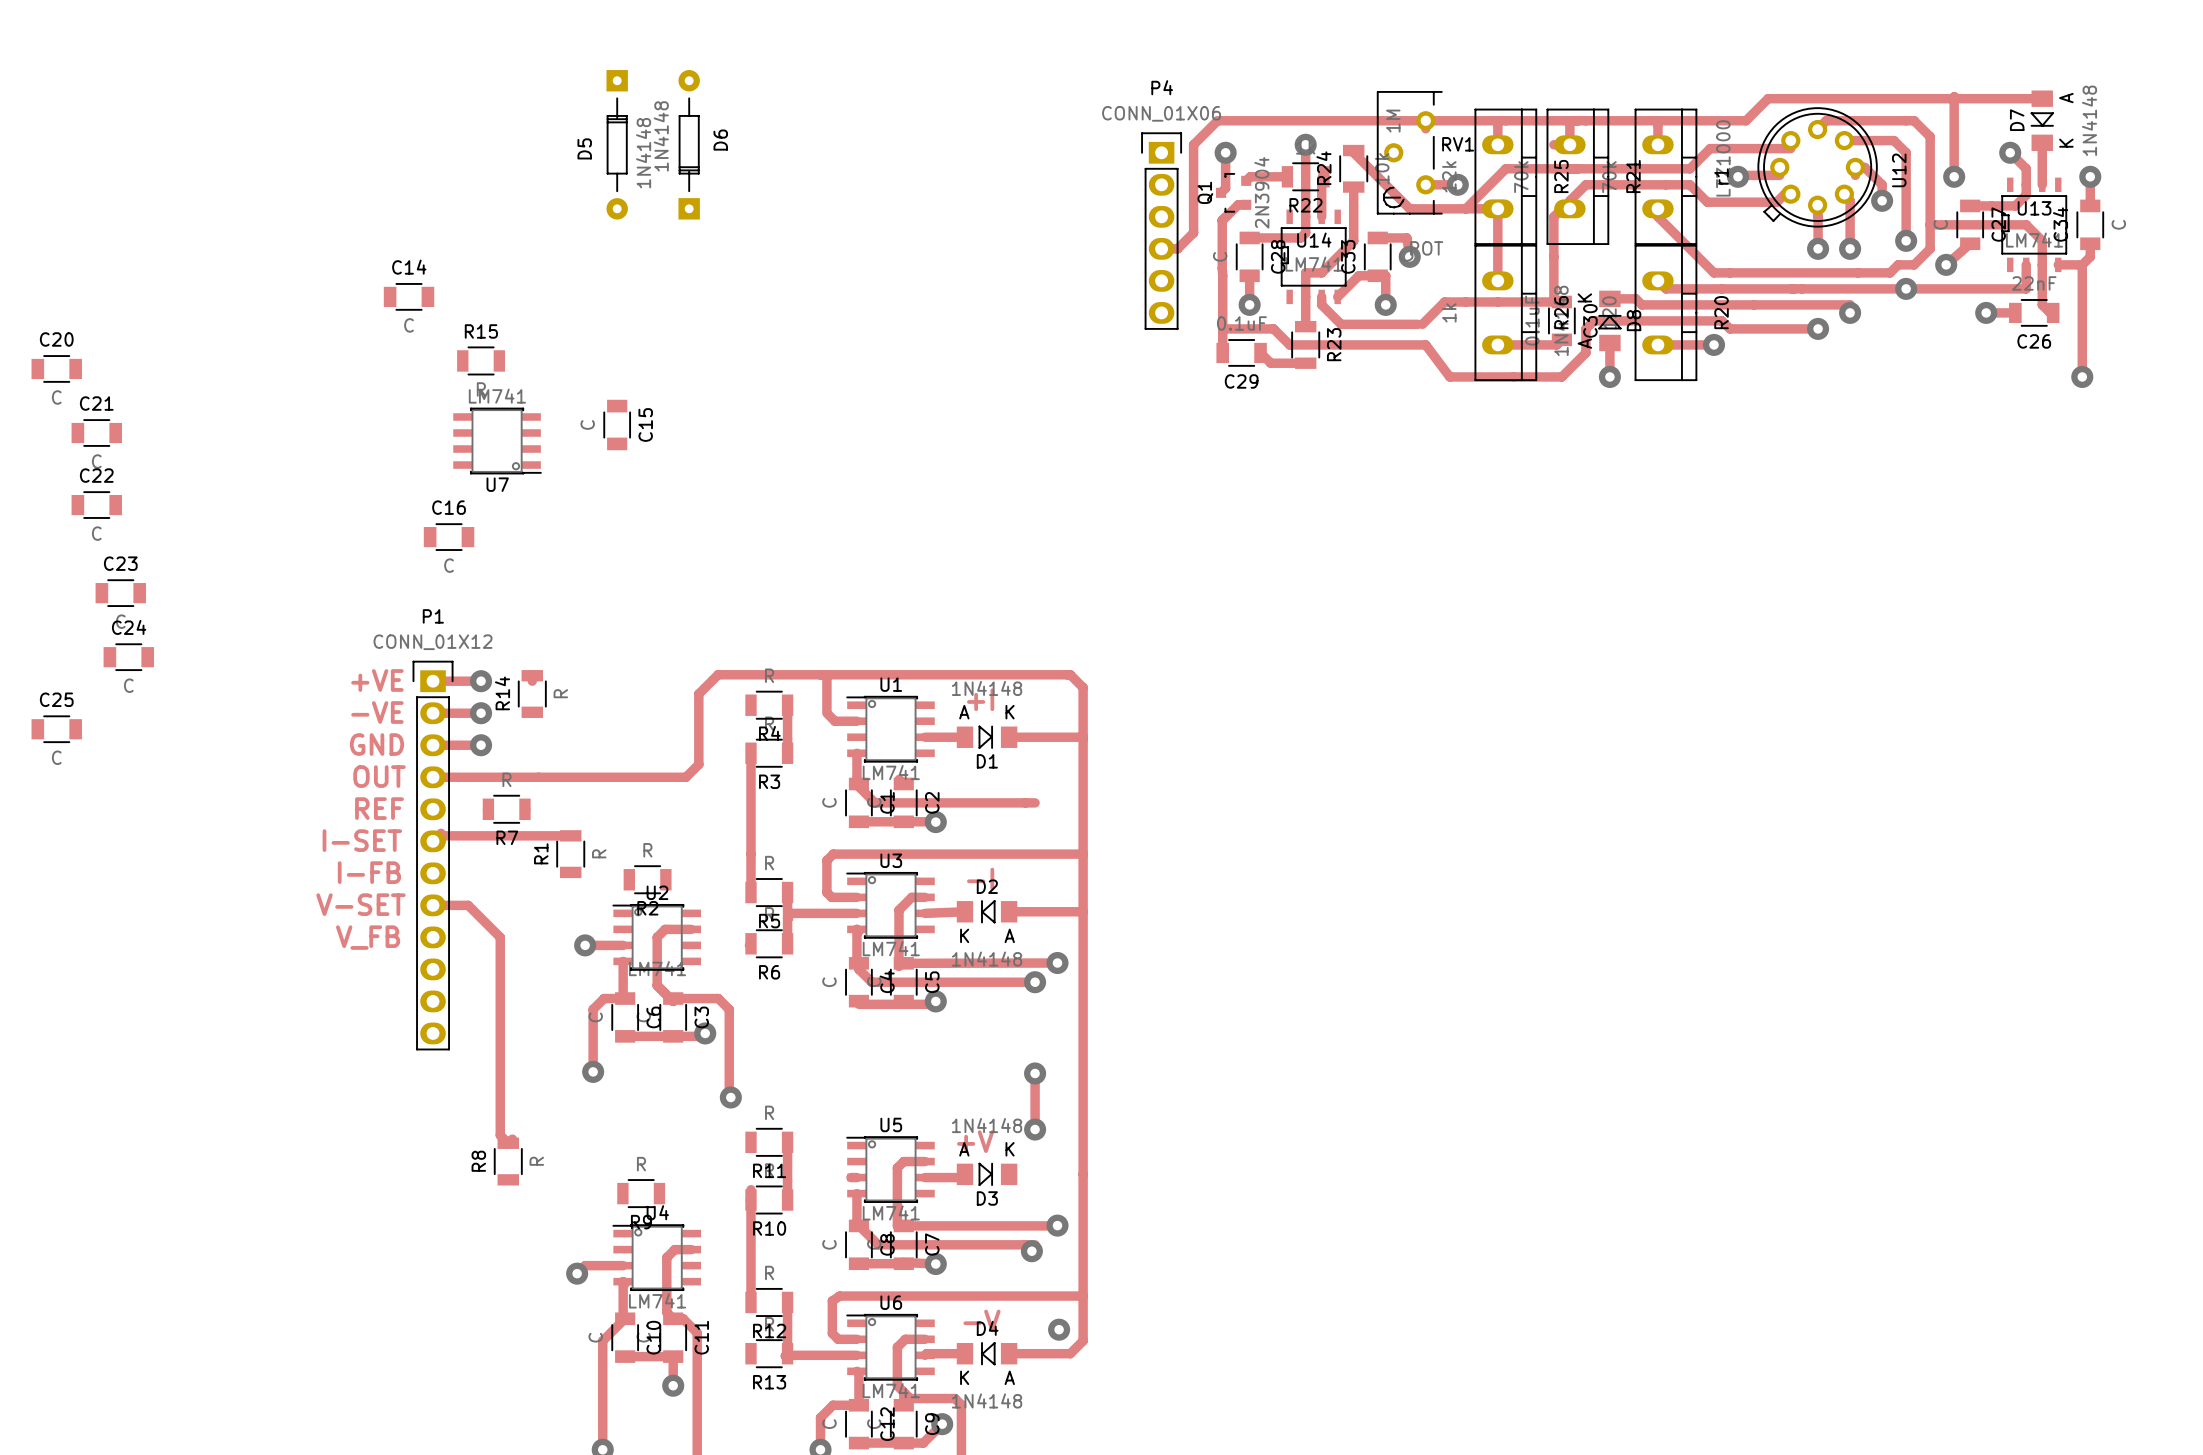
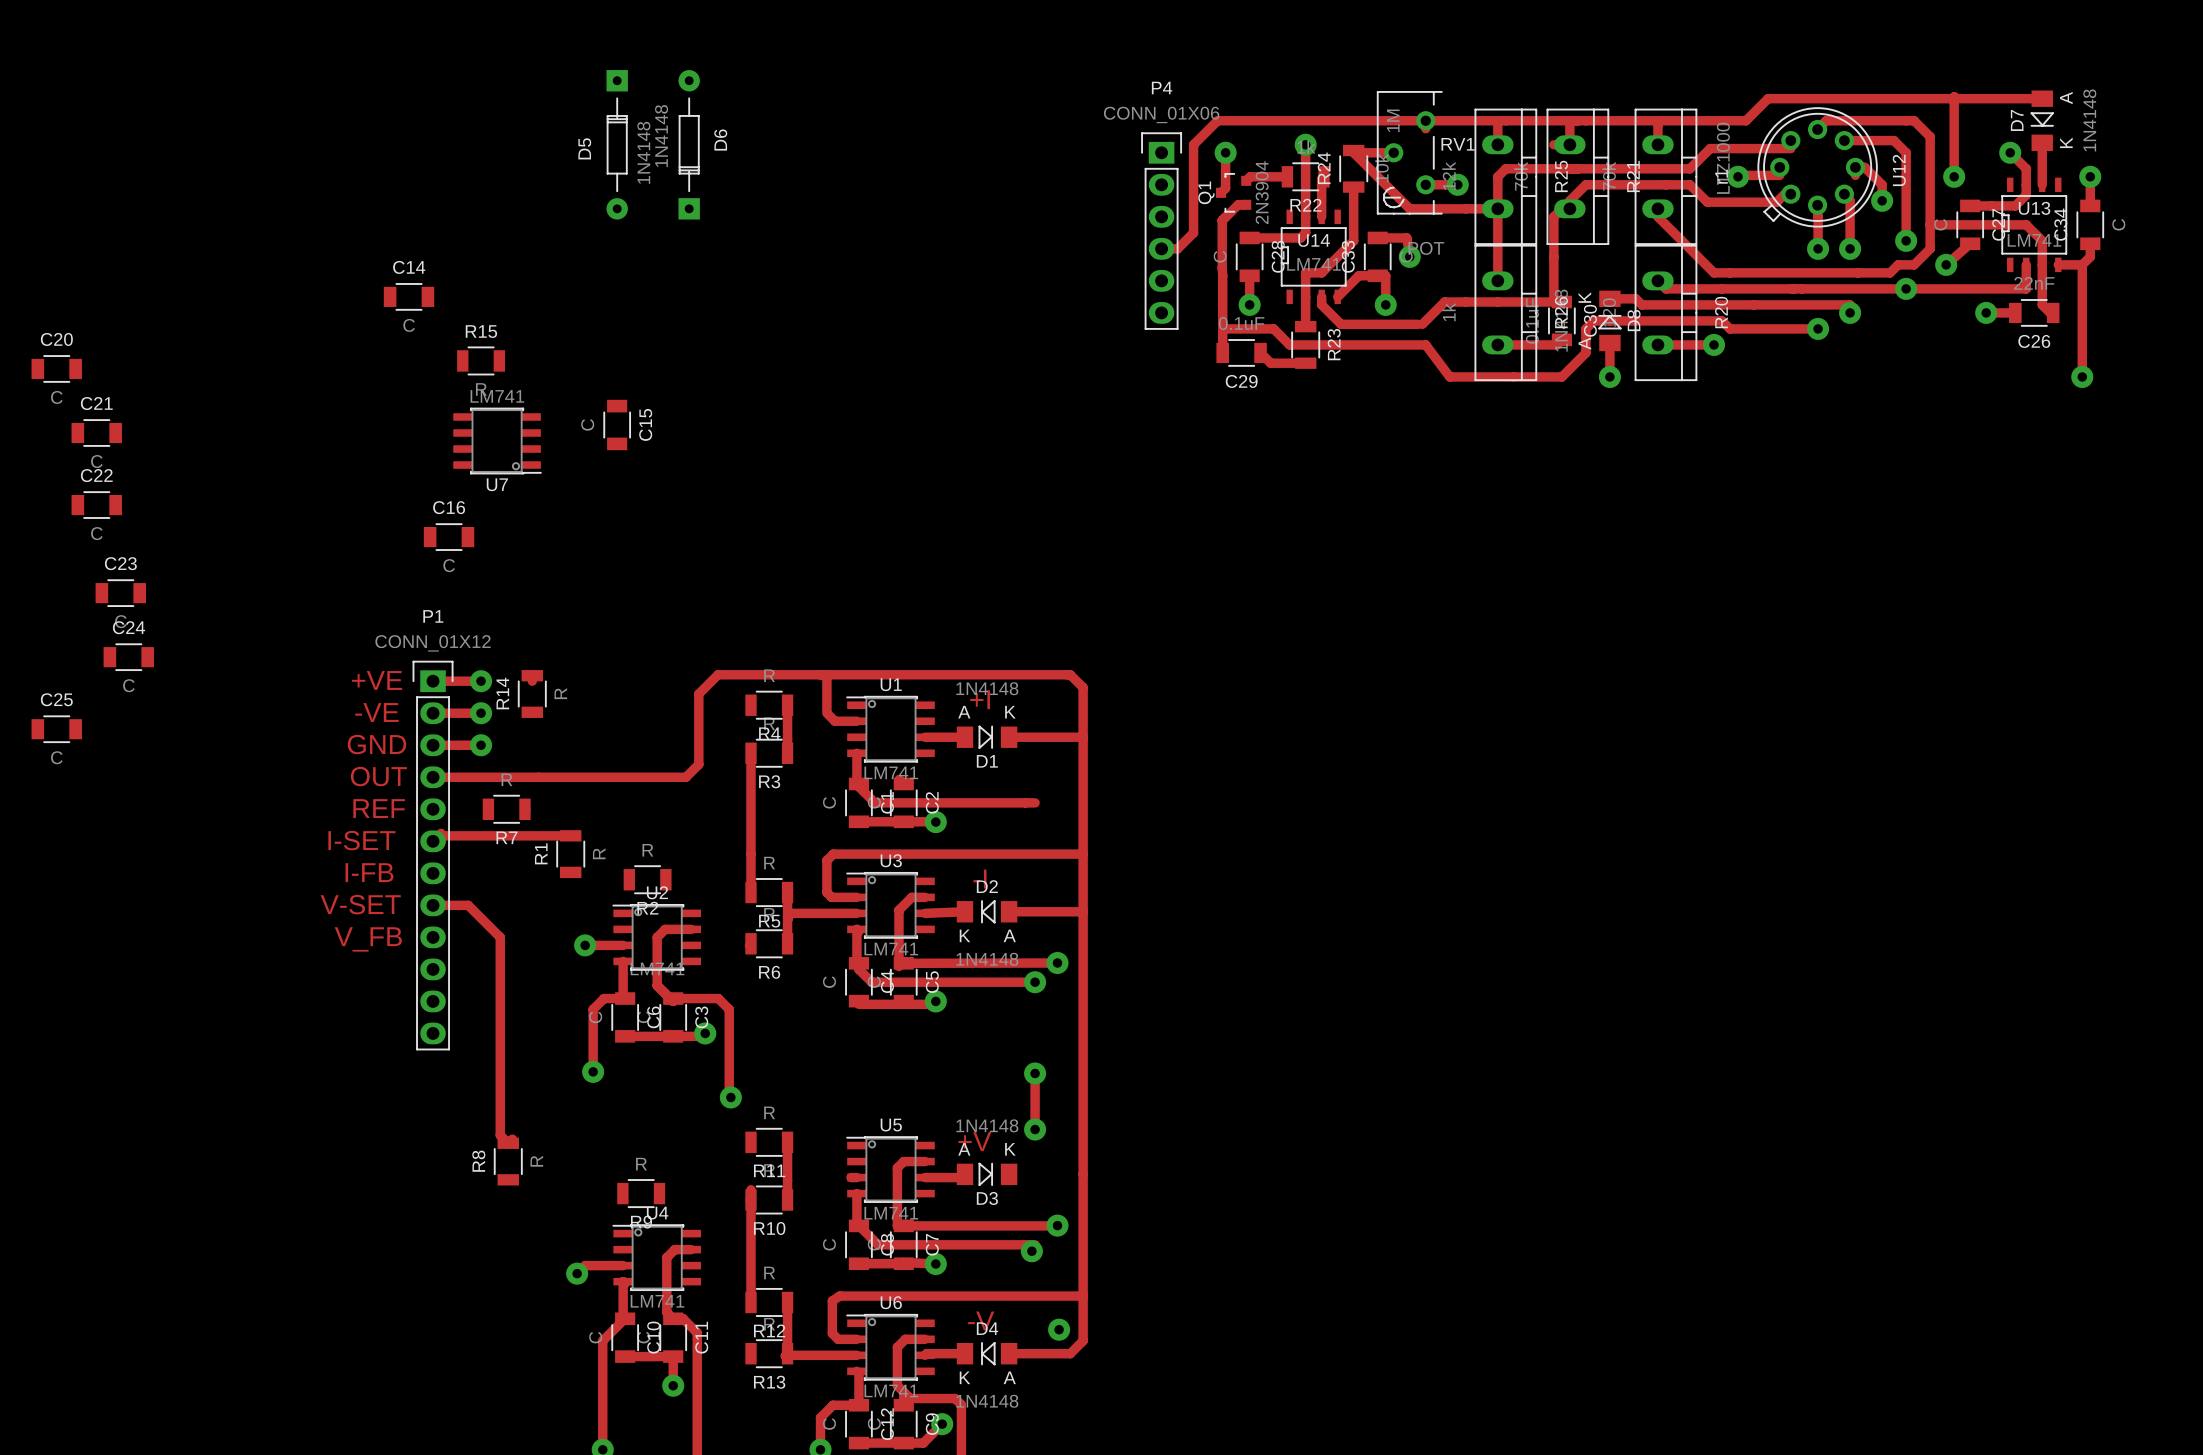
track: none -> (1353, 150) (1355, 152) (1393, 152)
track: (1497, 176) (1465, 208) -> (1497, 176) (1497, 208)

